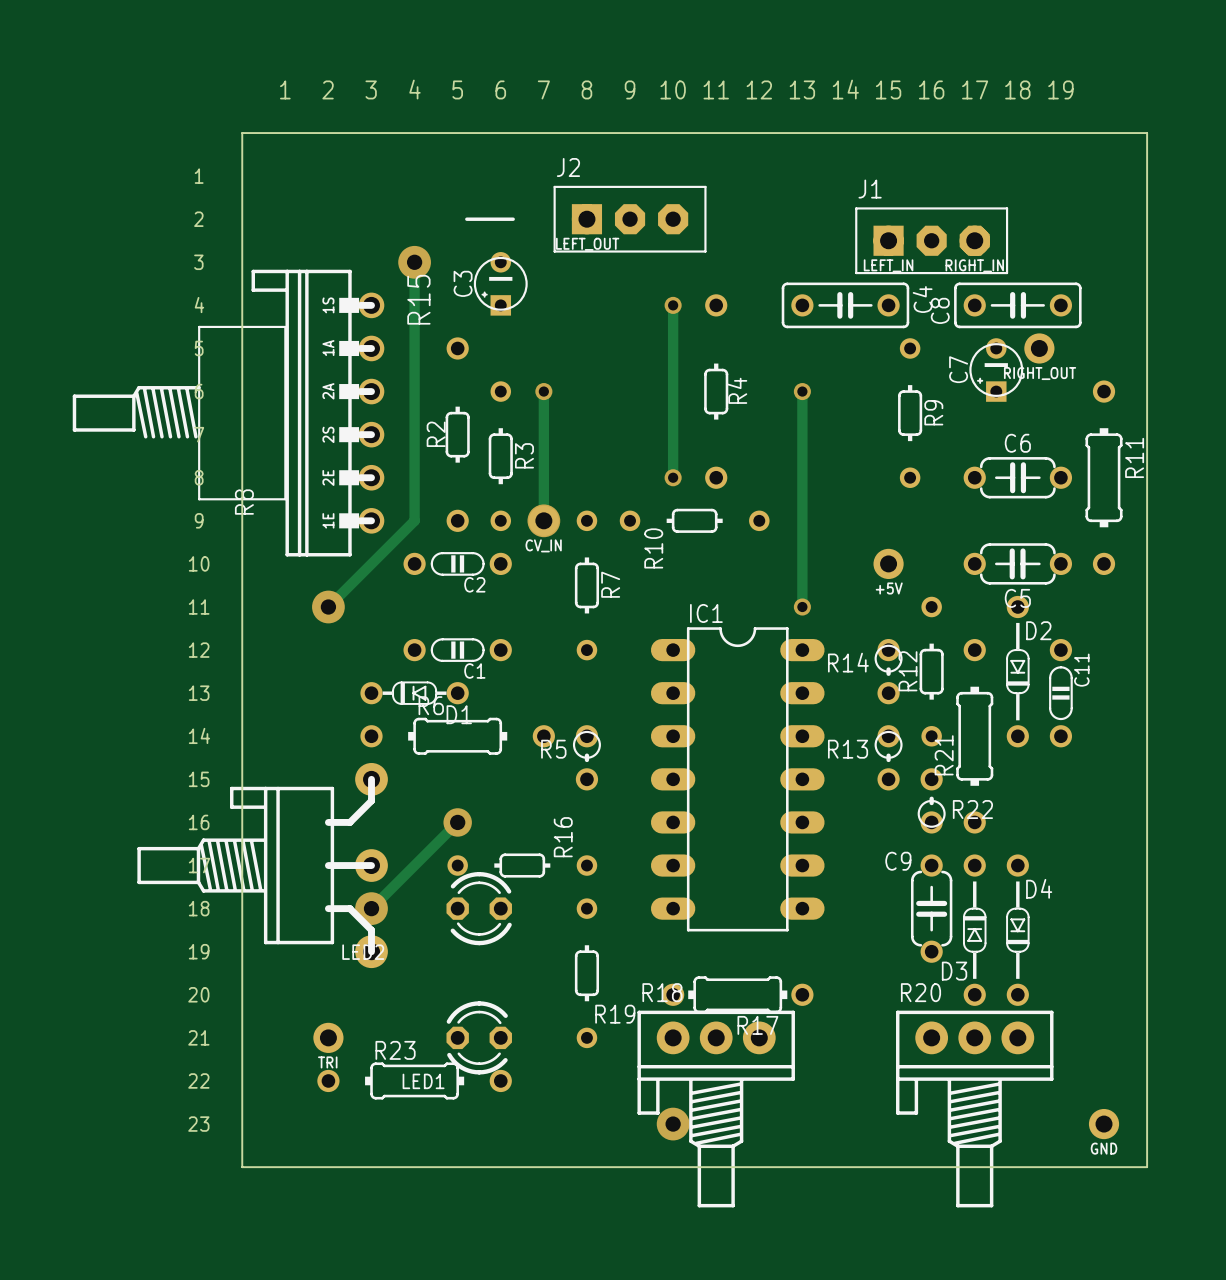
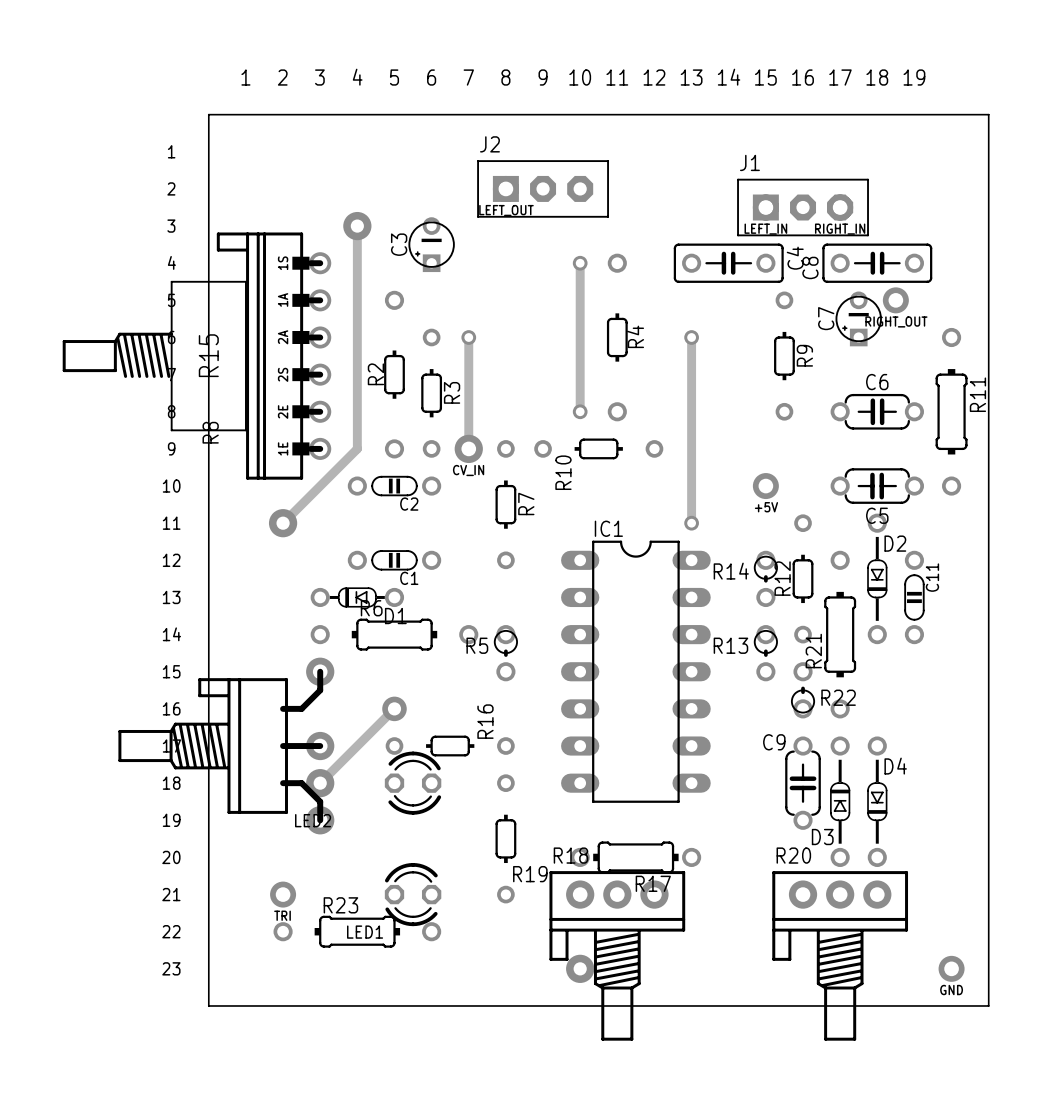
R15 footprint: [72, 217, 515, 557] -> [62, 232, 332, 480]
R15 name position: R15 (418, 299) -> R15 (208, 355)

